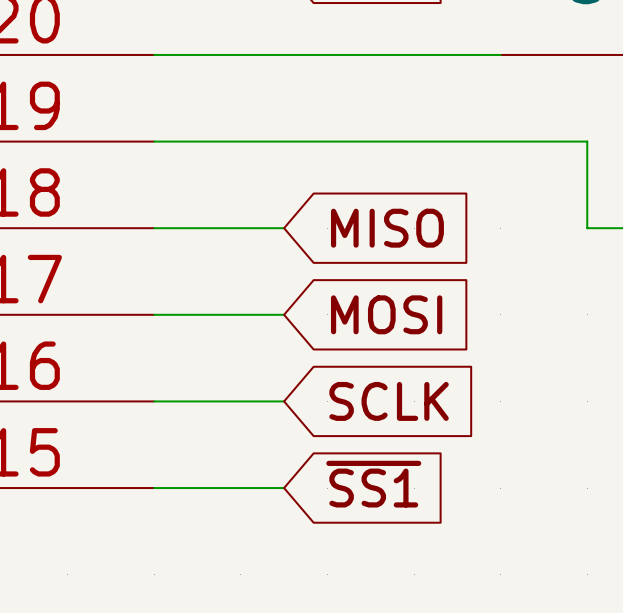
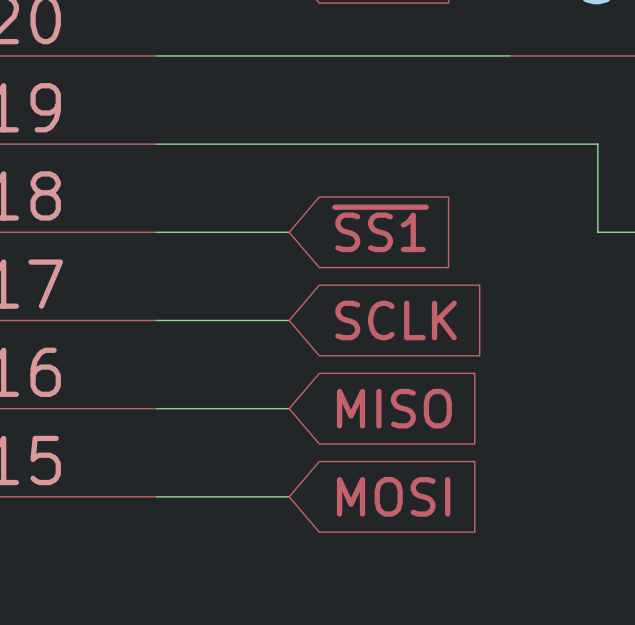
global label: MISO (387, 228) -> ~{SS1} (380, 228)
global label: MOSI (386, 314) -> SCLK (396, 320)
global label: SCLK (389, 401) -> MISO (394, 408)
global label: ~{SS1} (373, 484) -> MOSI (393, 496)

